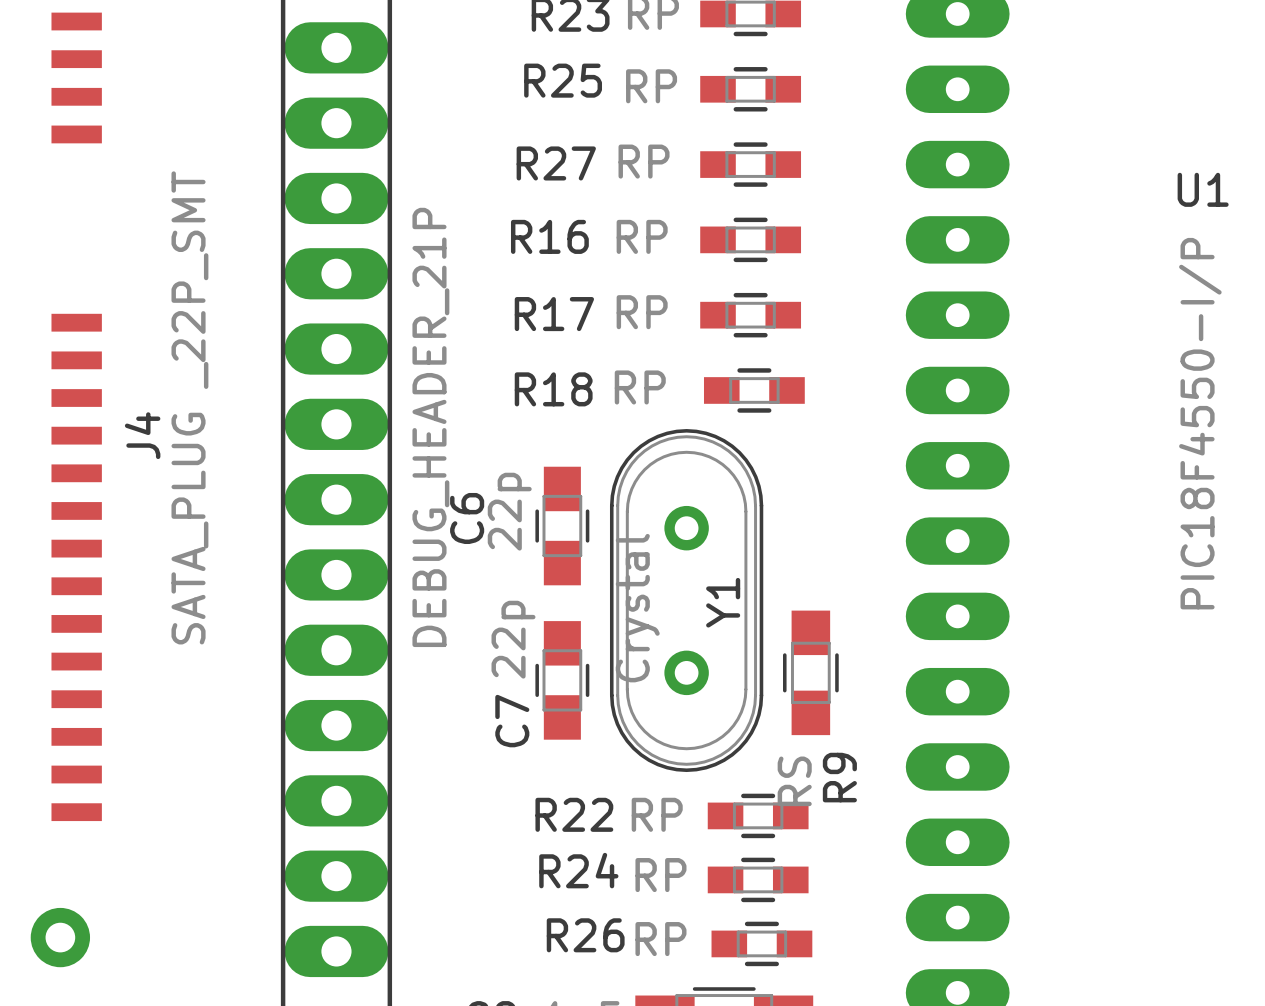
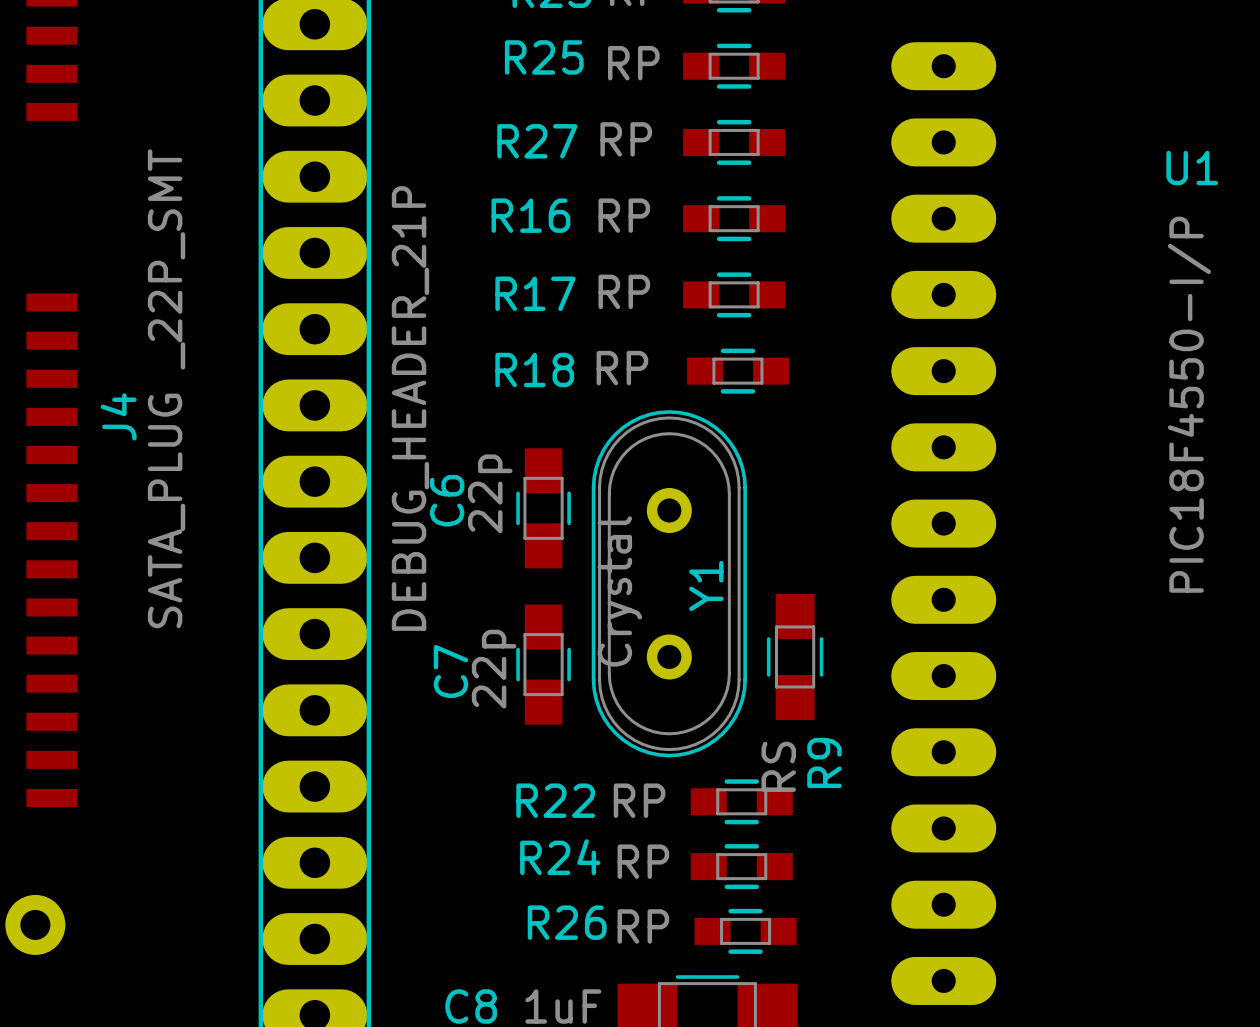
C7 value position: 22p (513, 639) -> 22p (494, 669)
C7 name position: C7 (512, 721) -> C7 (450, 671)

